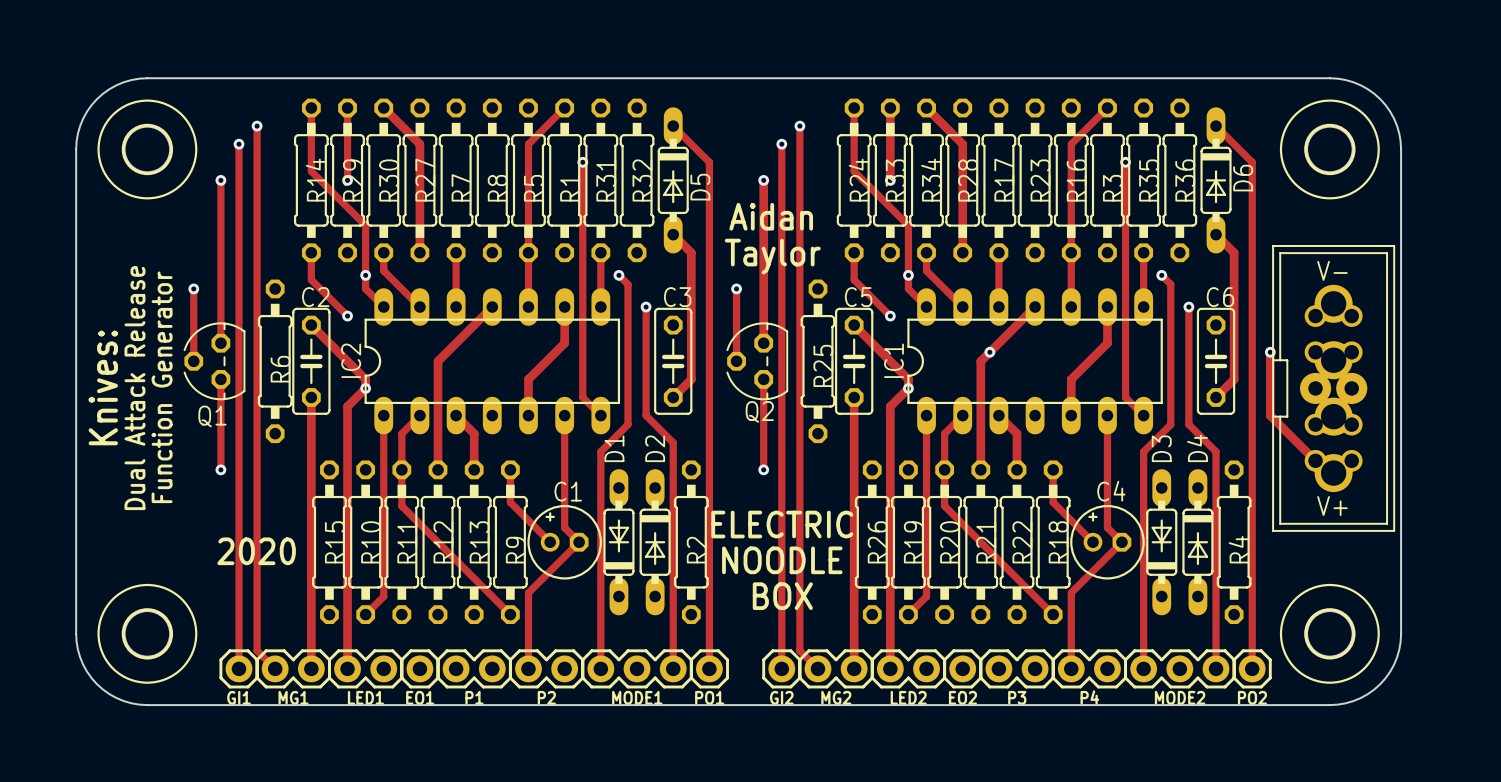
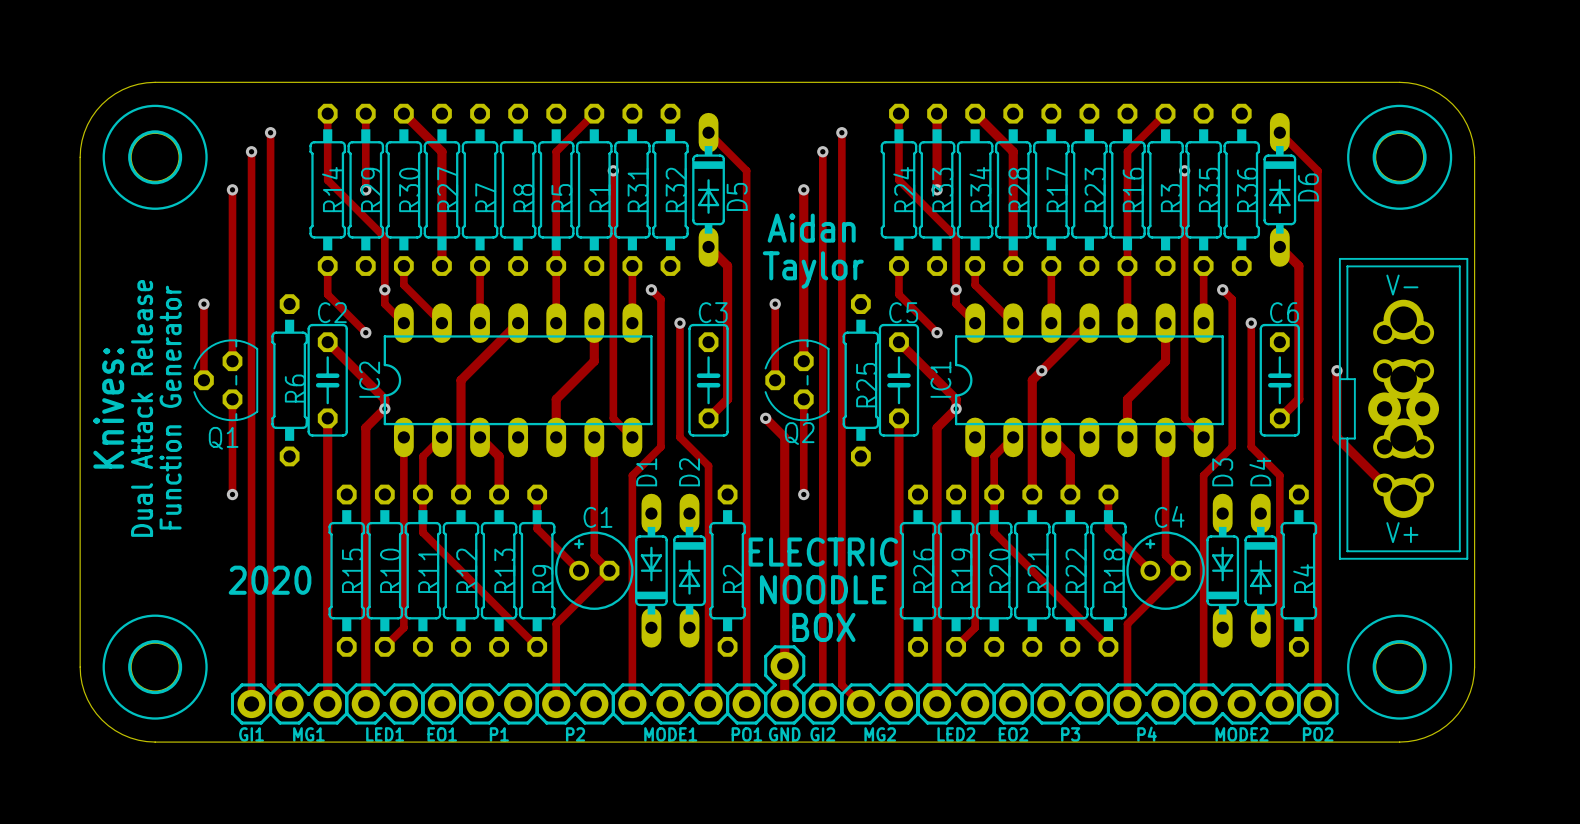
track: none -> (765, 418) (784, 437) (784, 703)
via: none -> (765, 418)
GND: none -> (784, 684)

